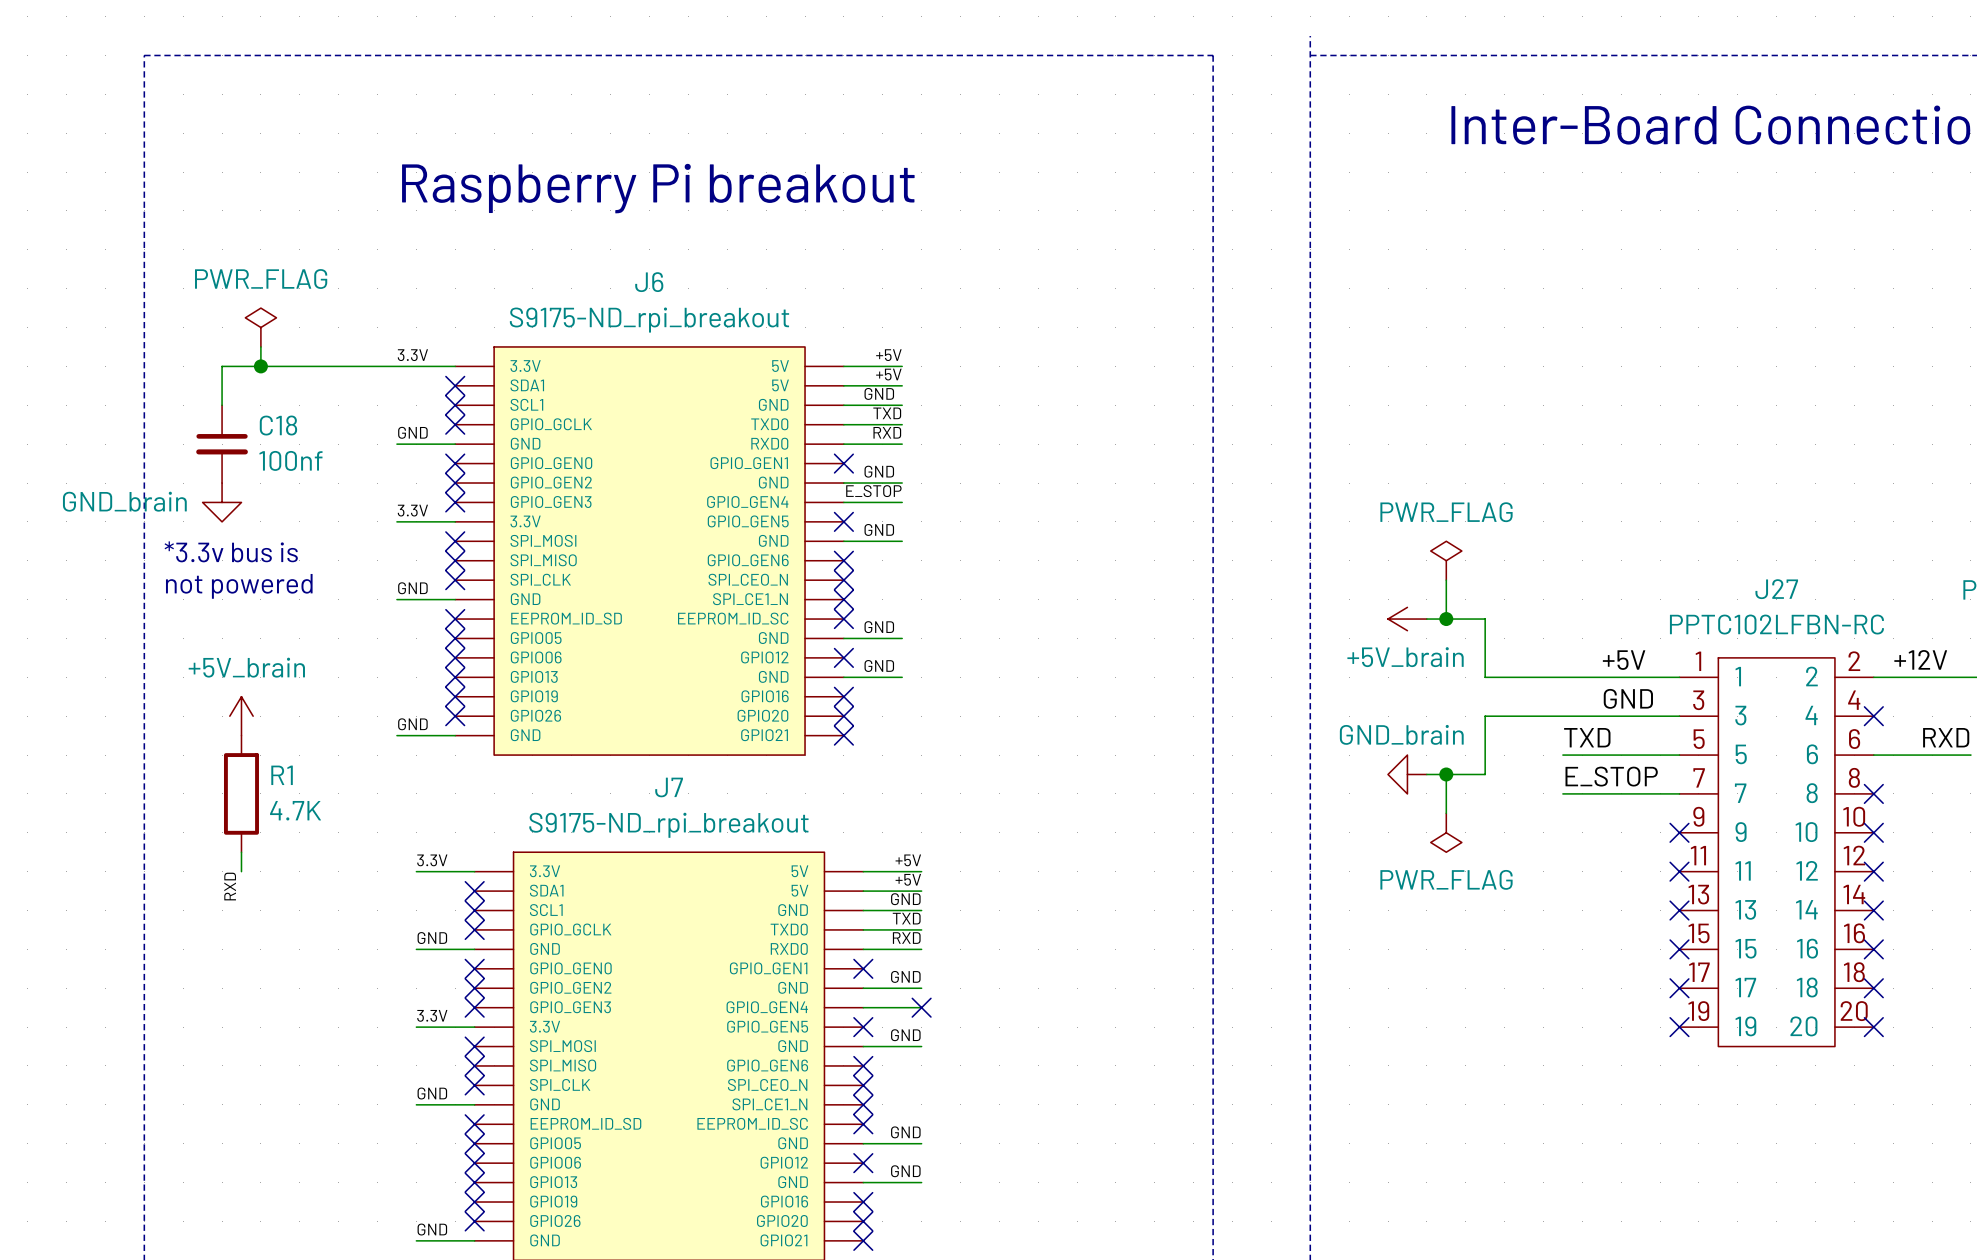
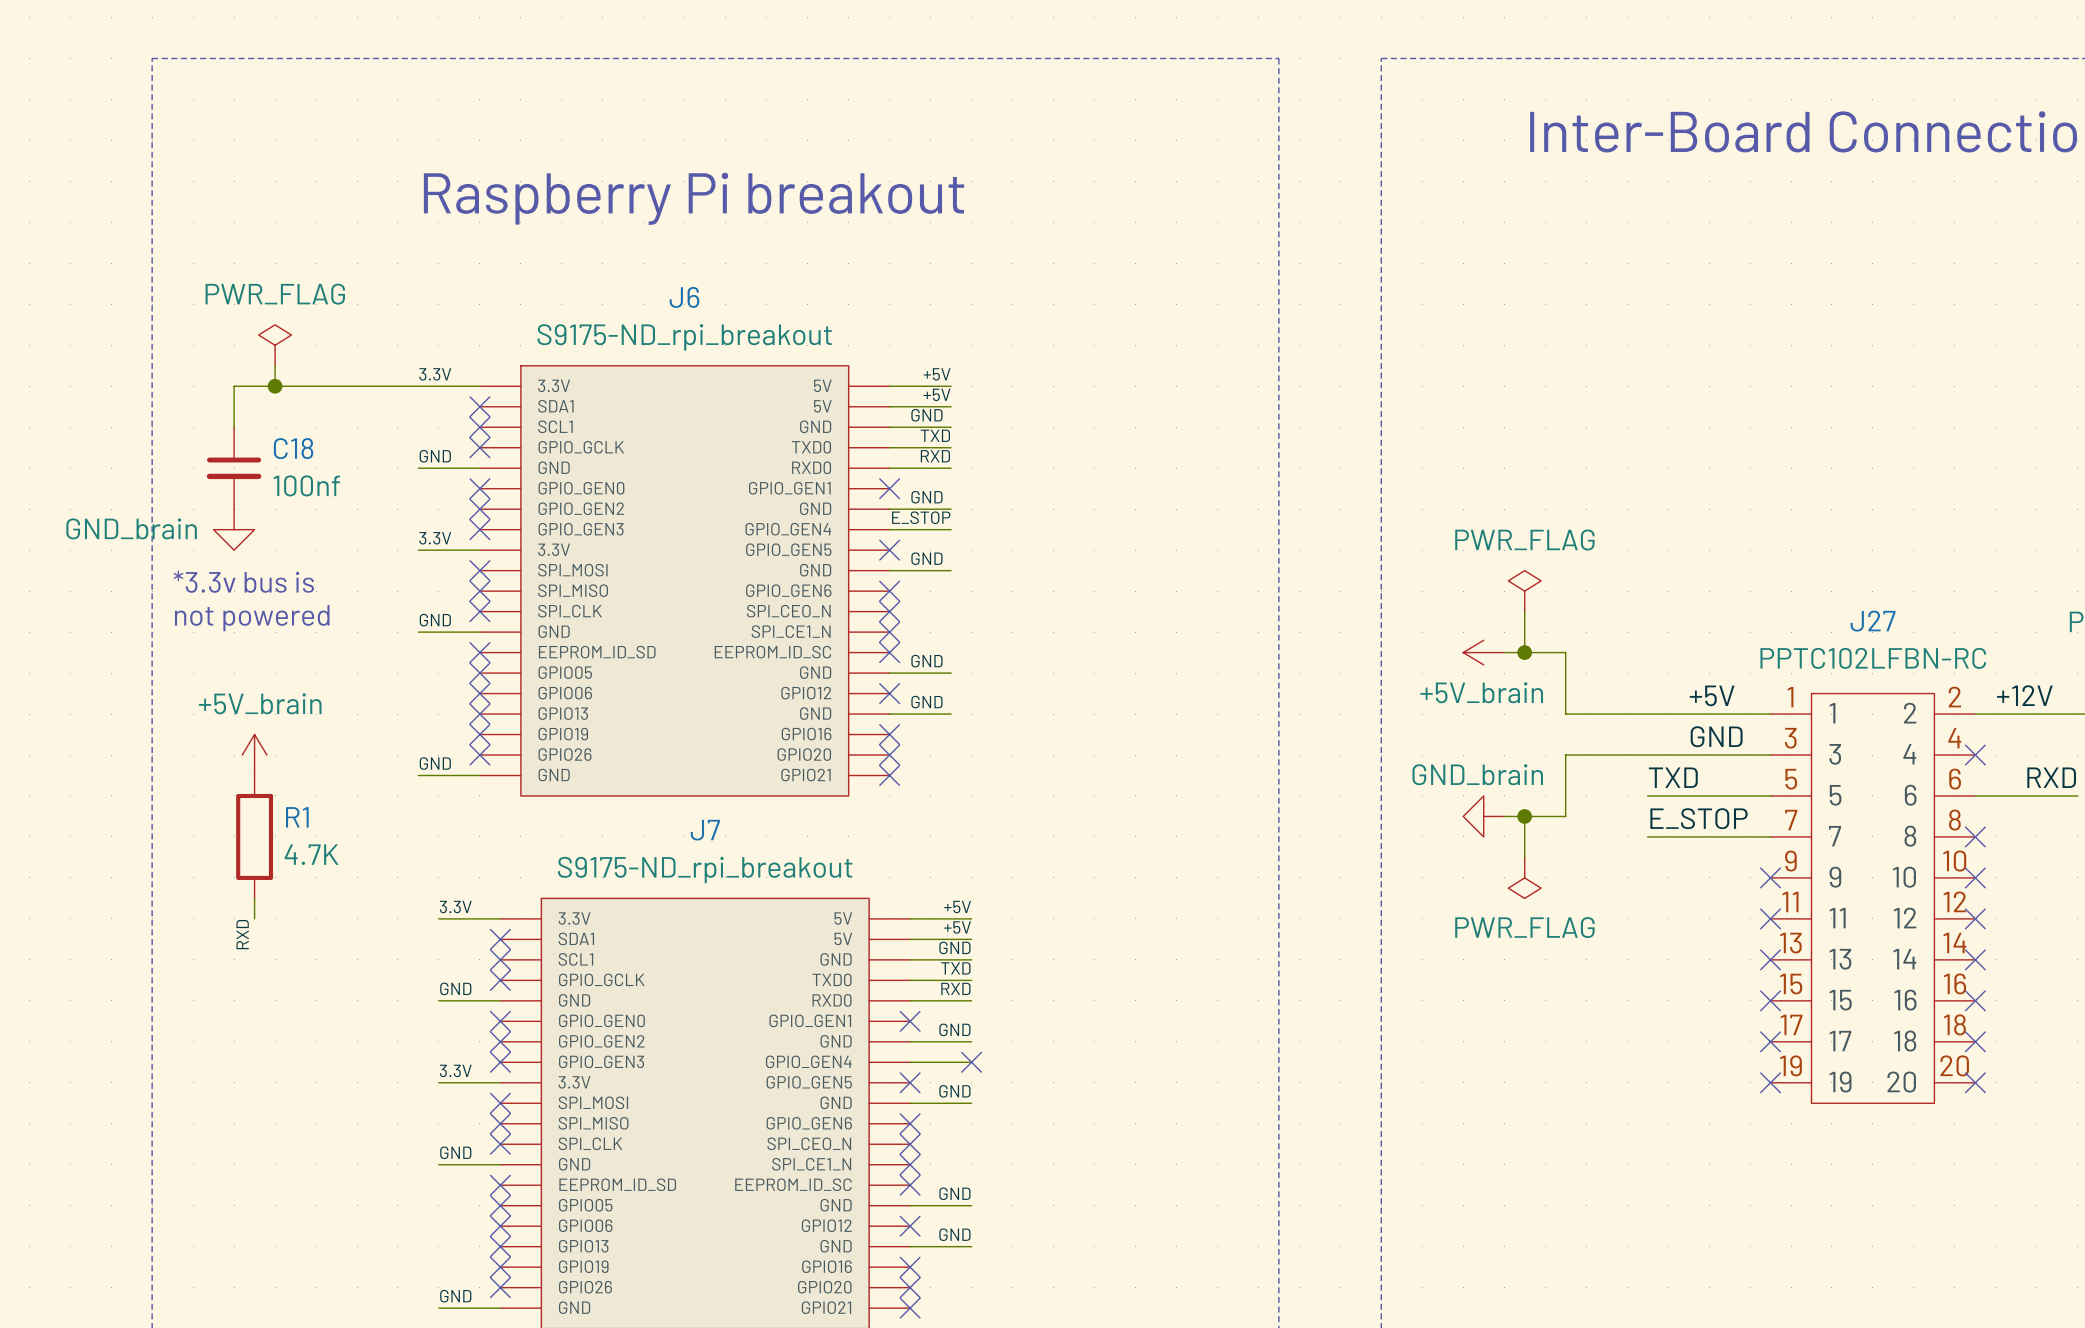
line: (1310, 36) (1310, 55) -> none

